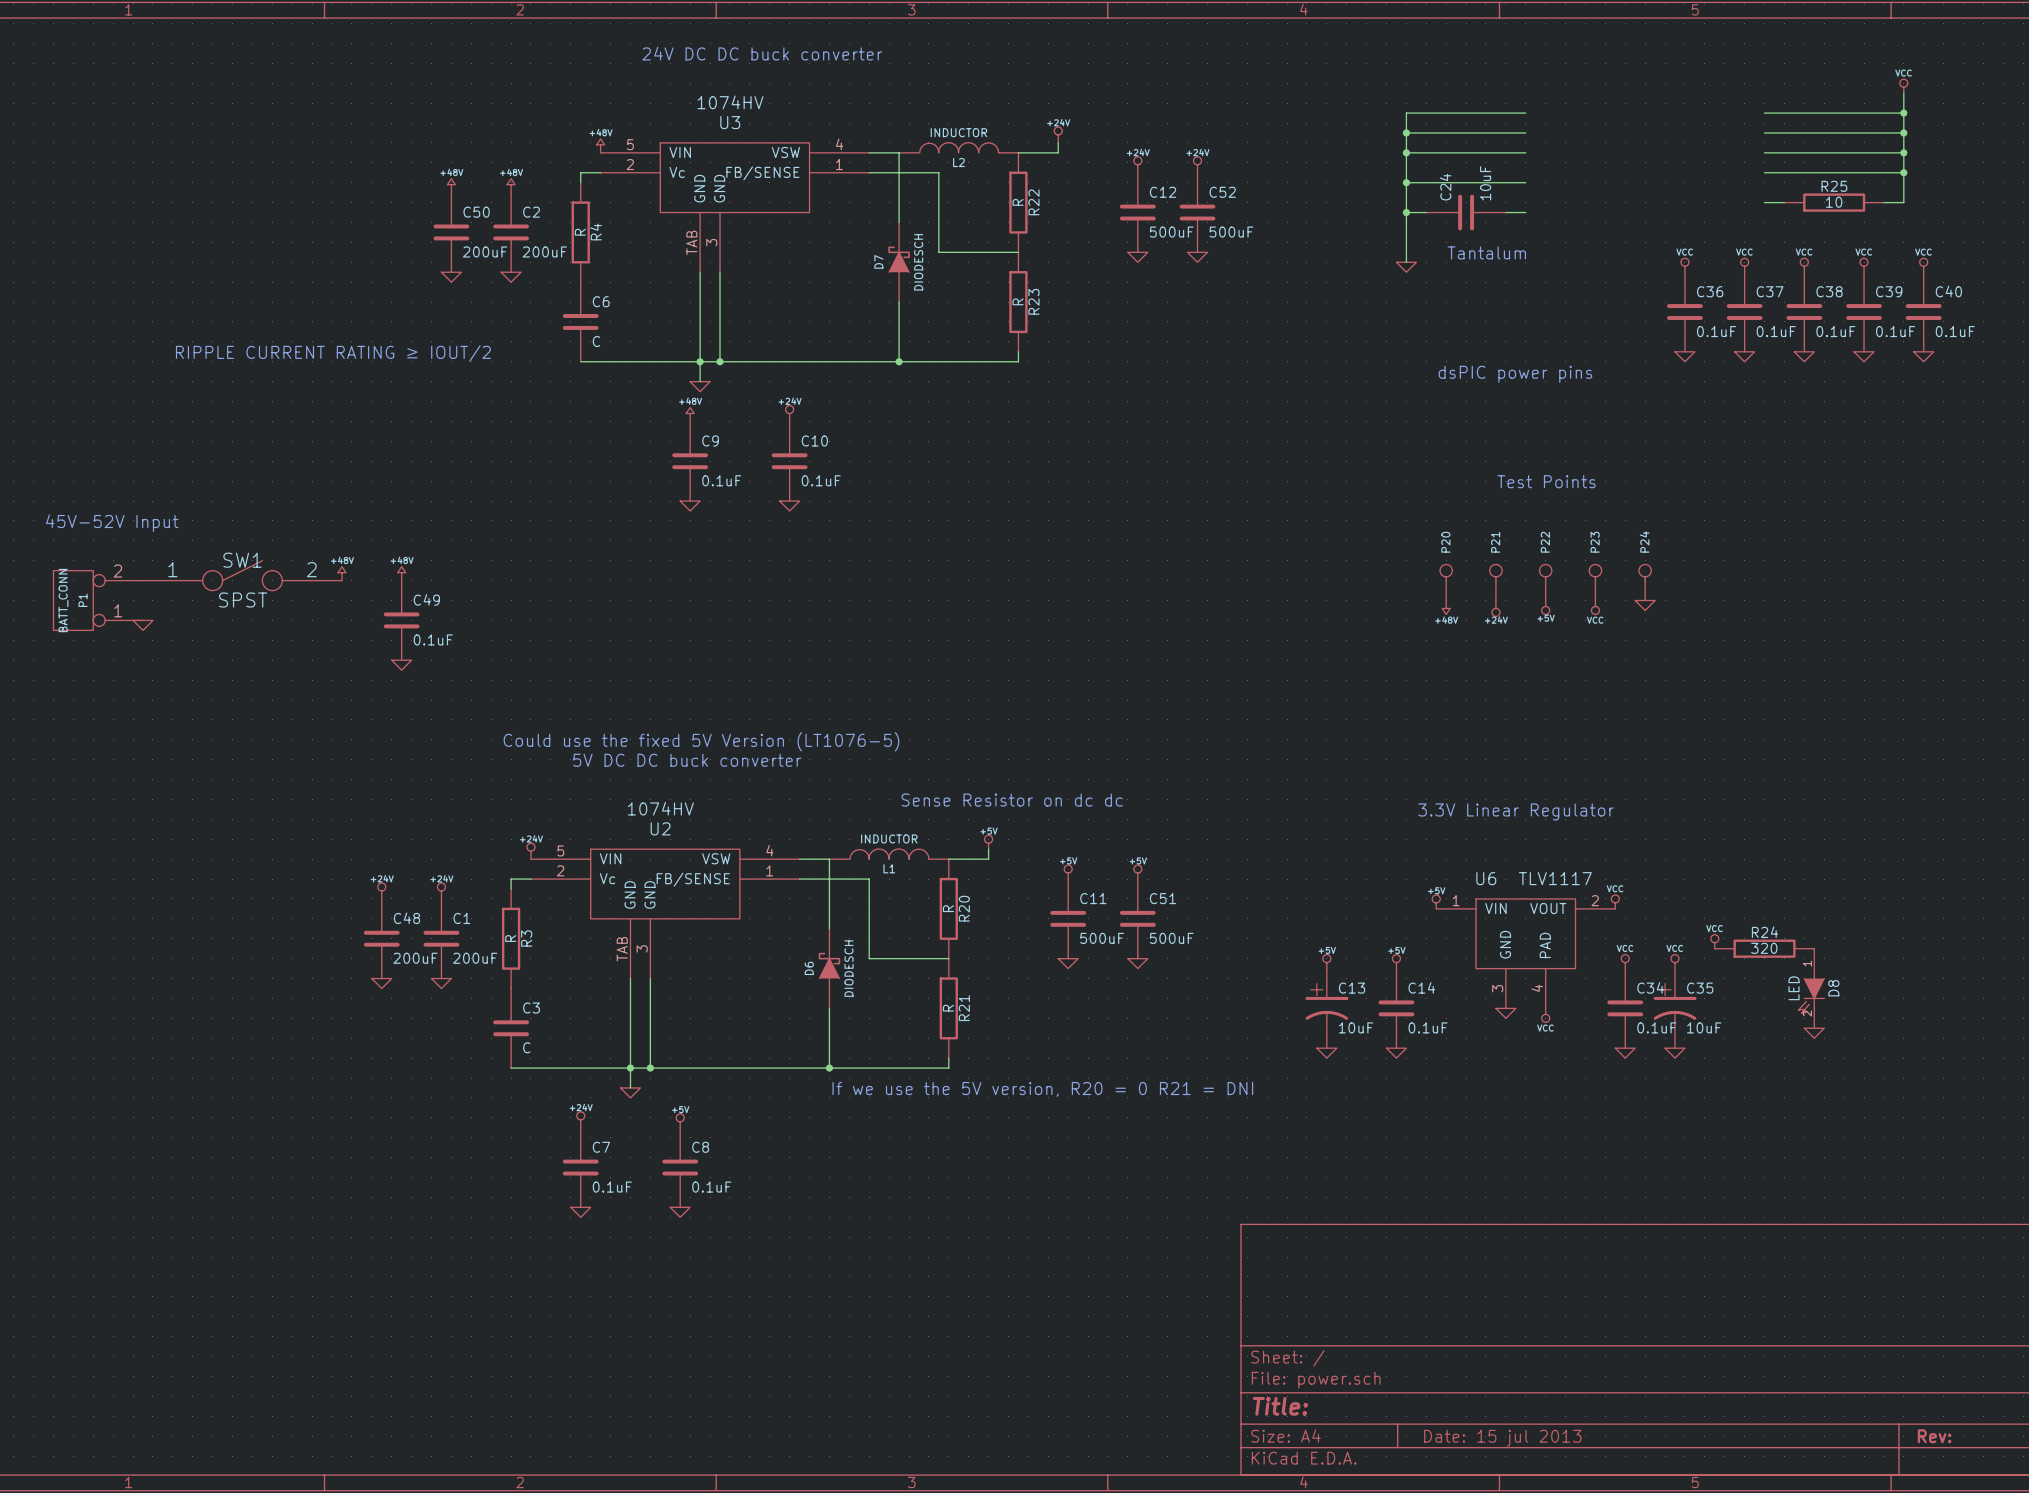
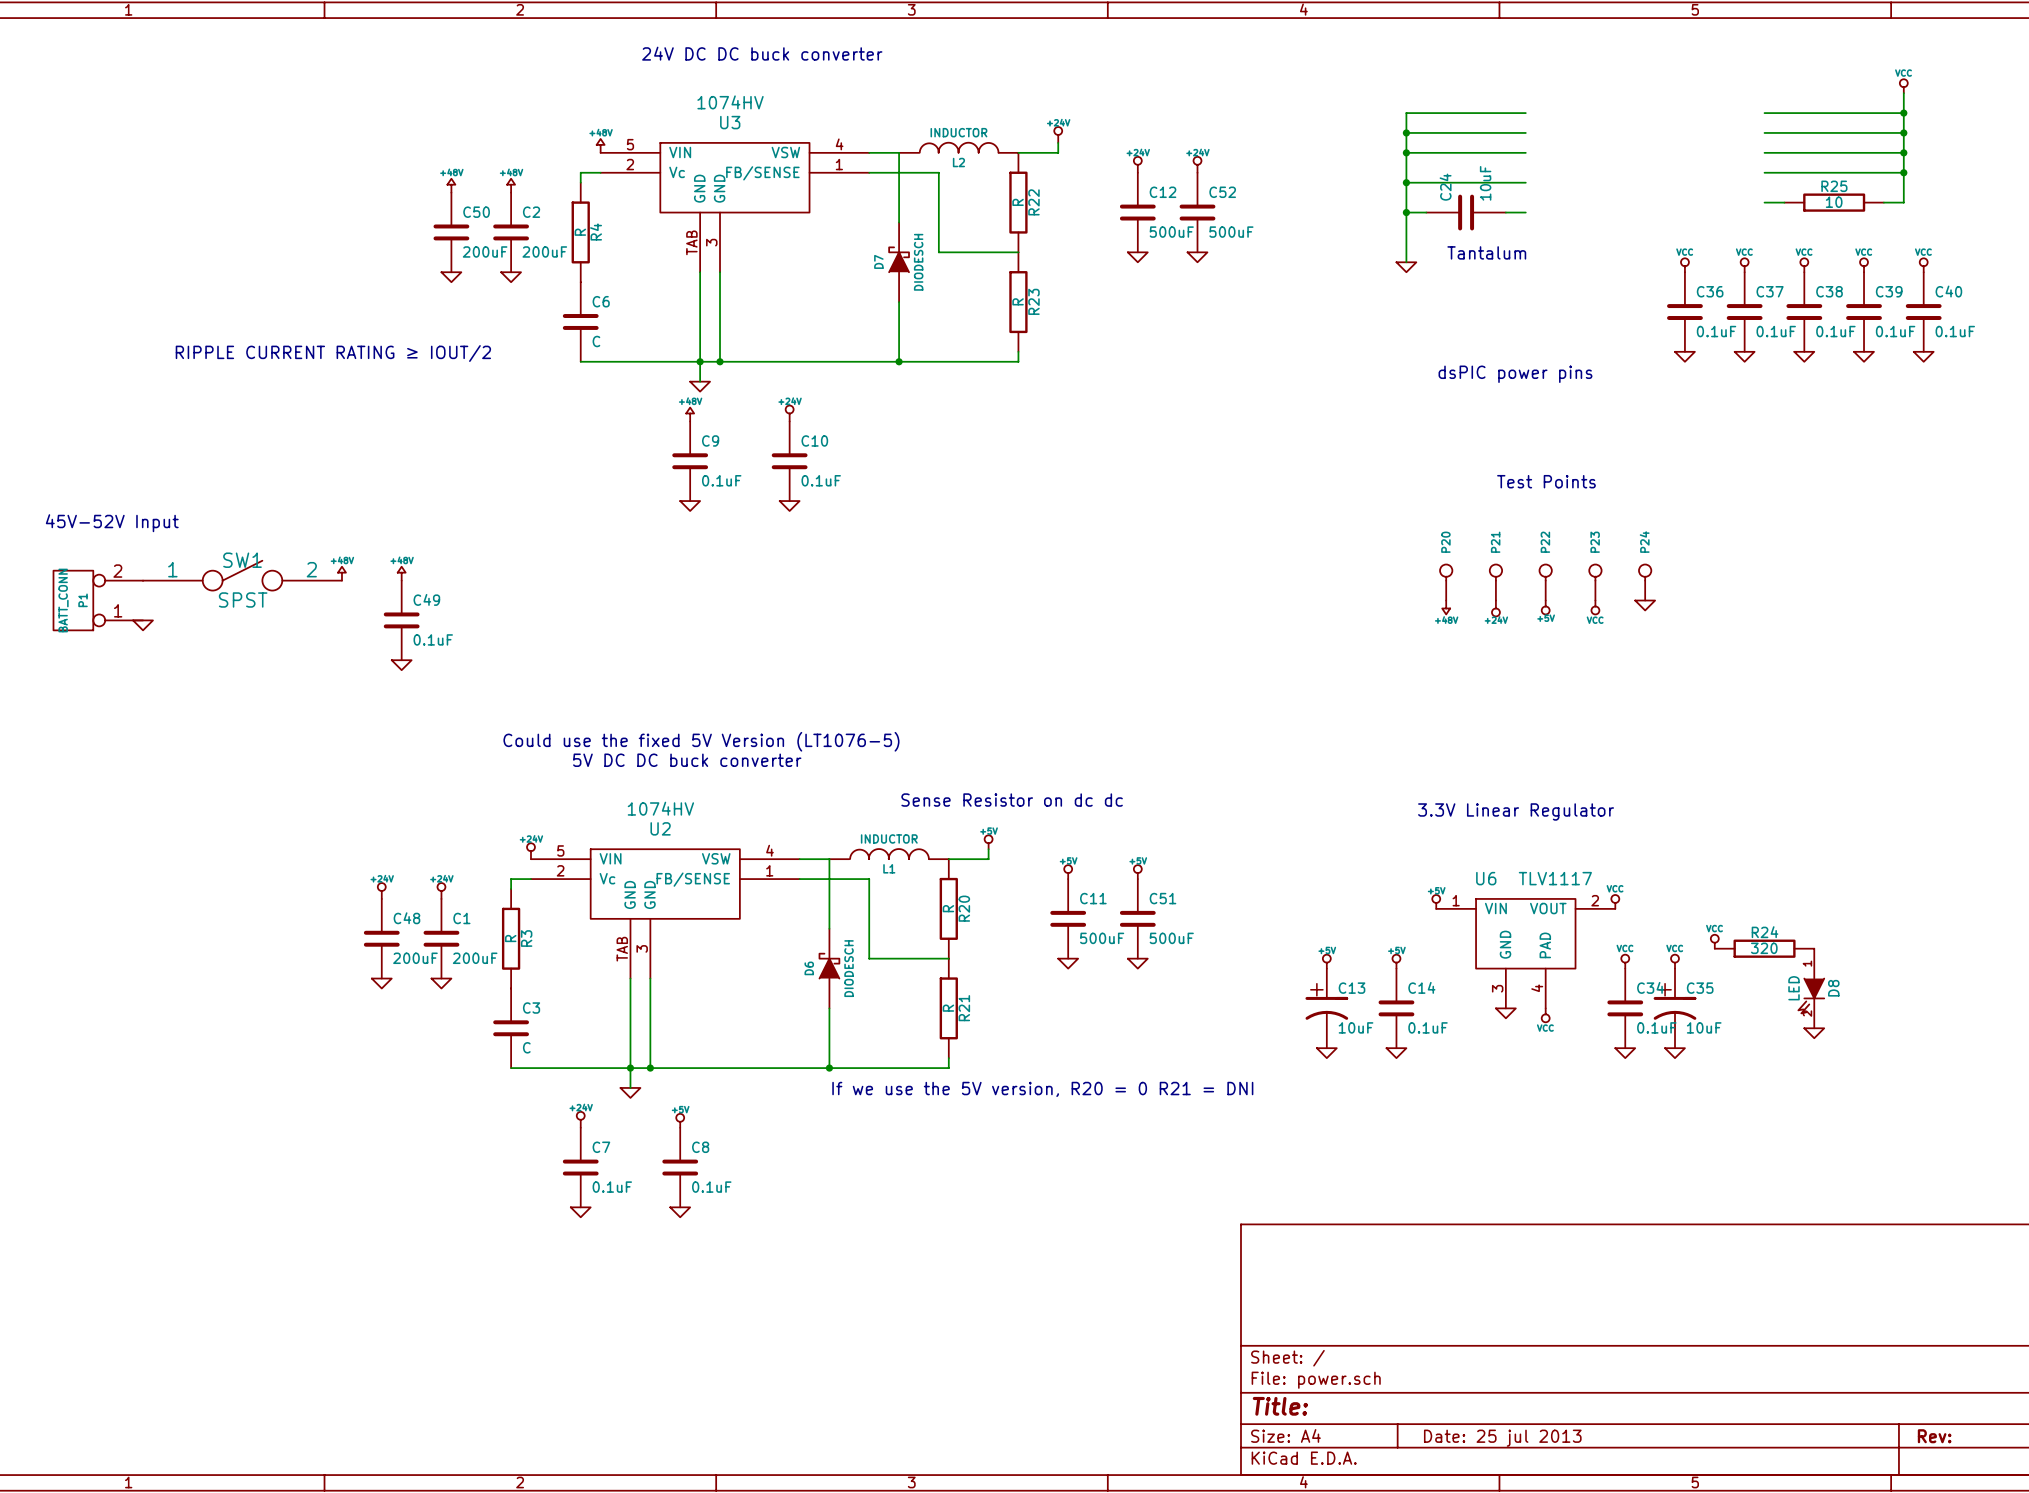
title block: Date: 15 jul 2013 (1502, 1438) -> Date: 25 jul 2013 (1502, 1438)

